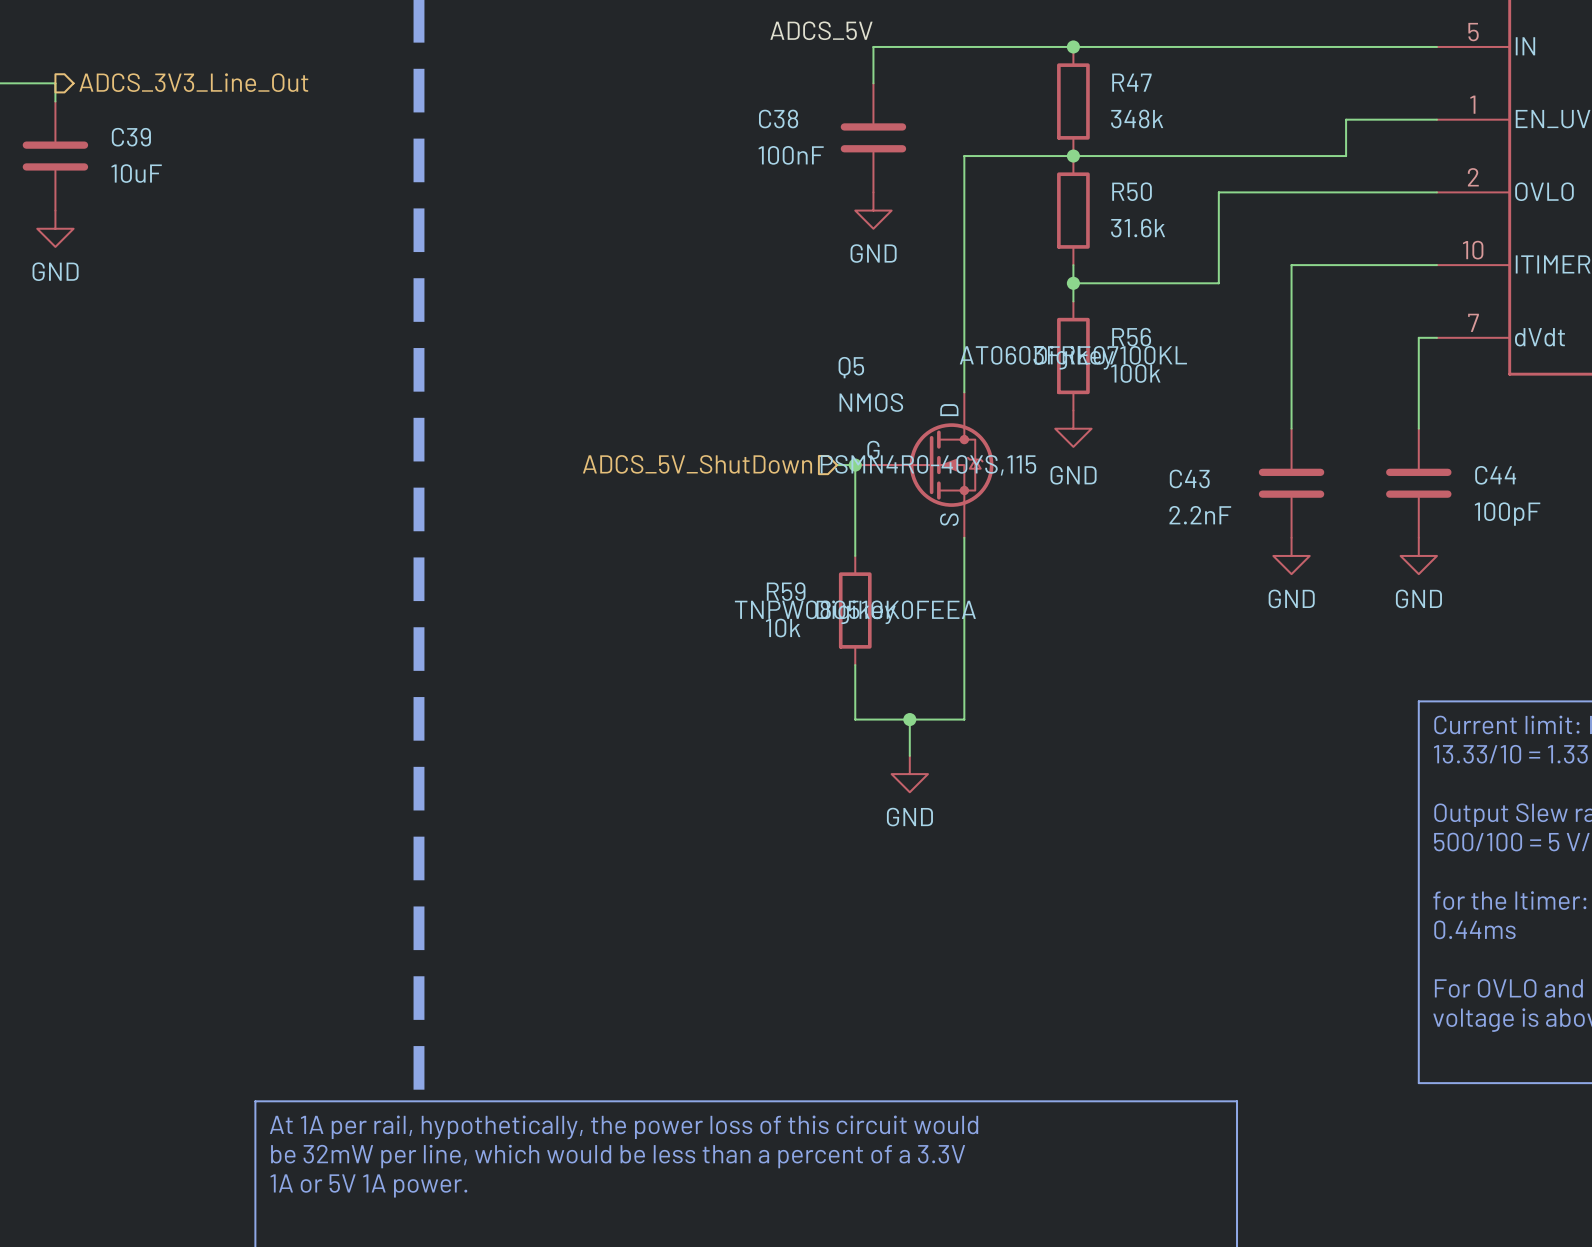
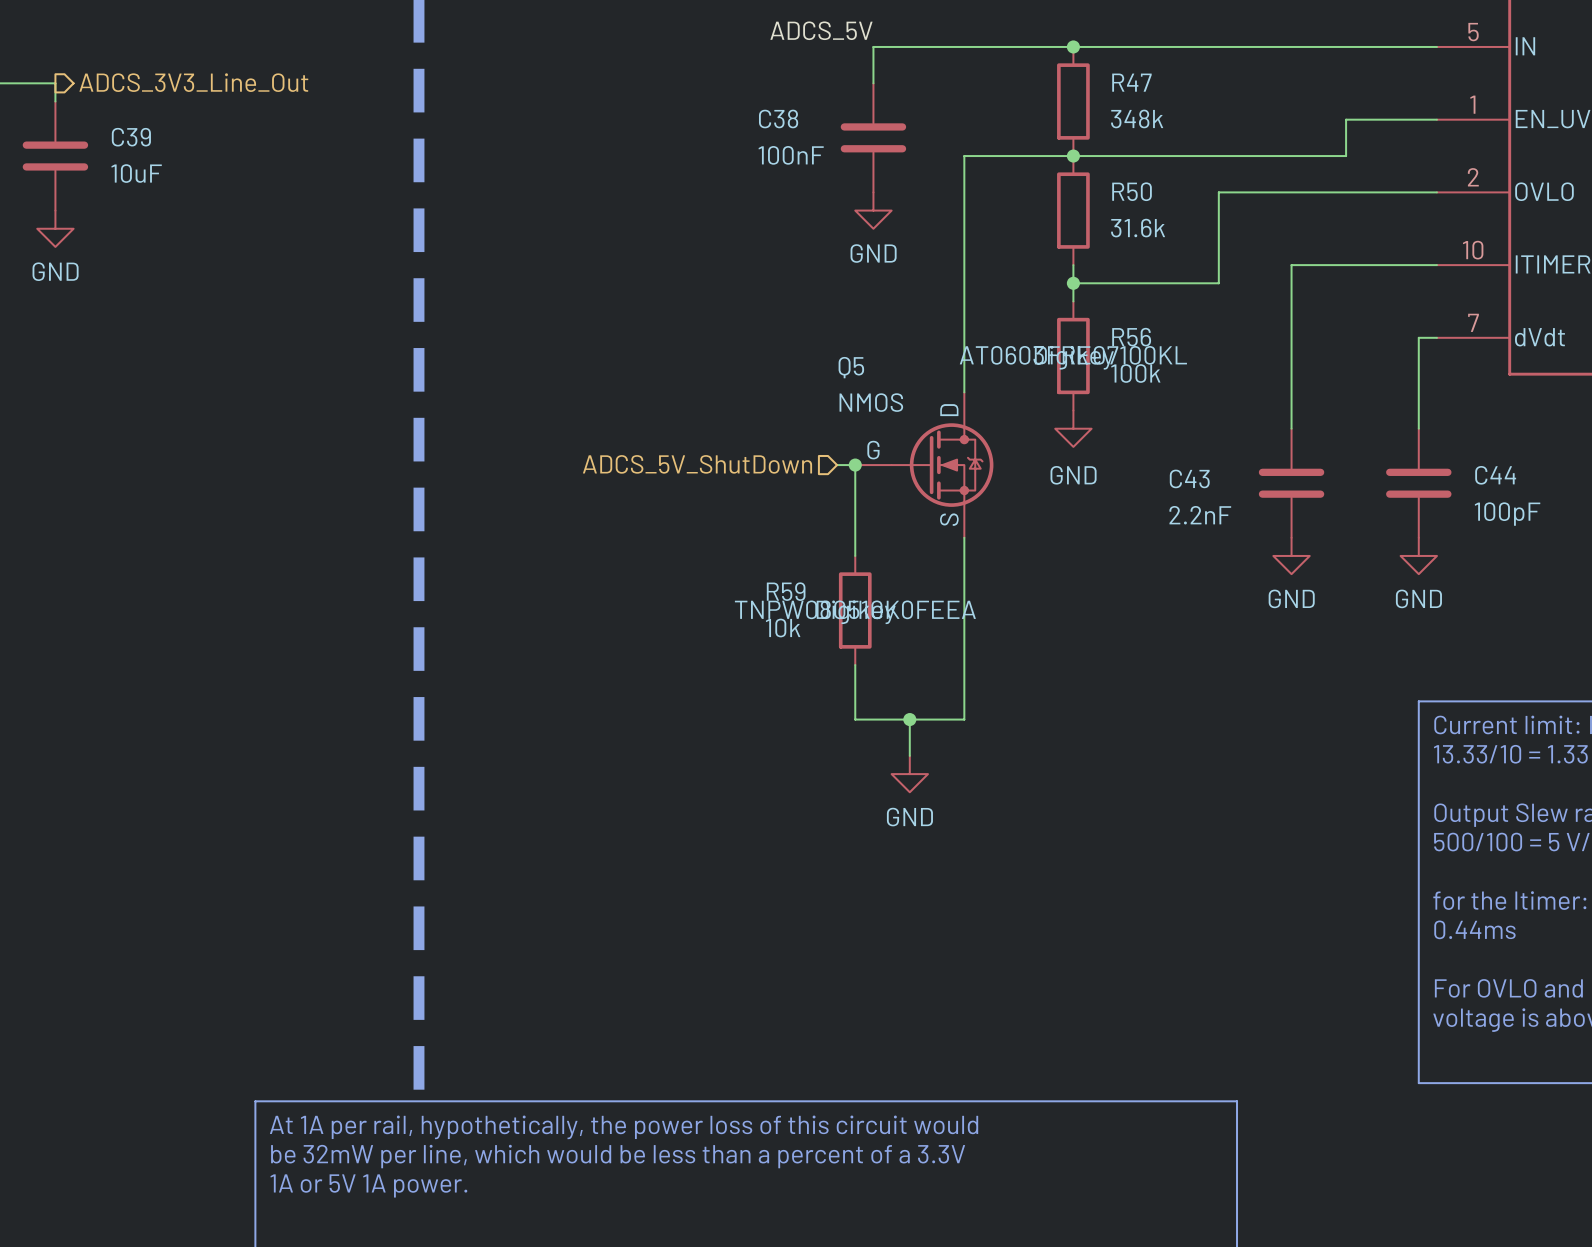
Q5 text: PSMN4R0-40YS,115 (928, 465) -> none

